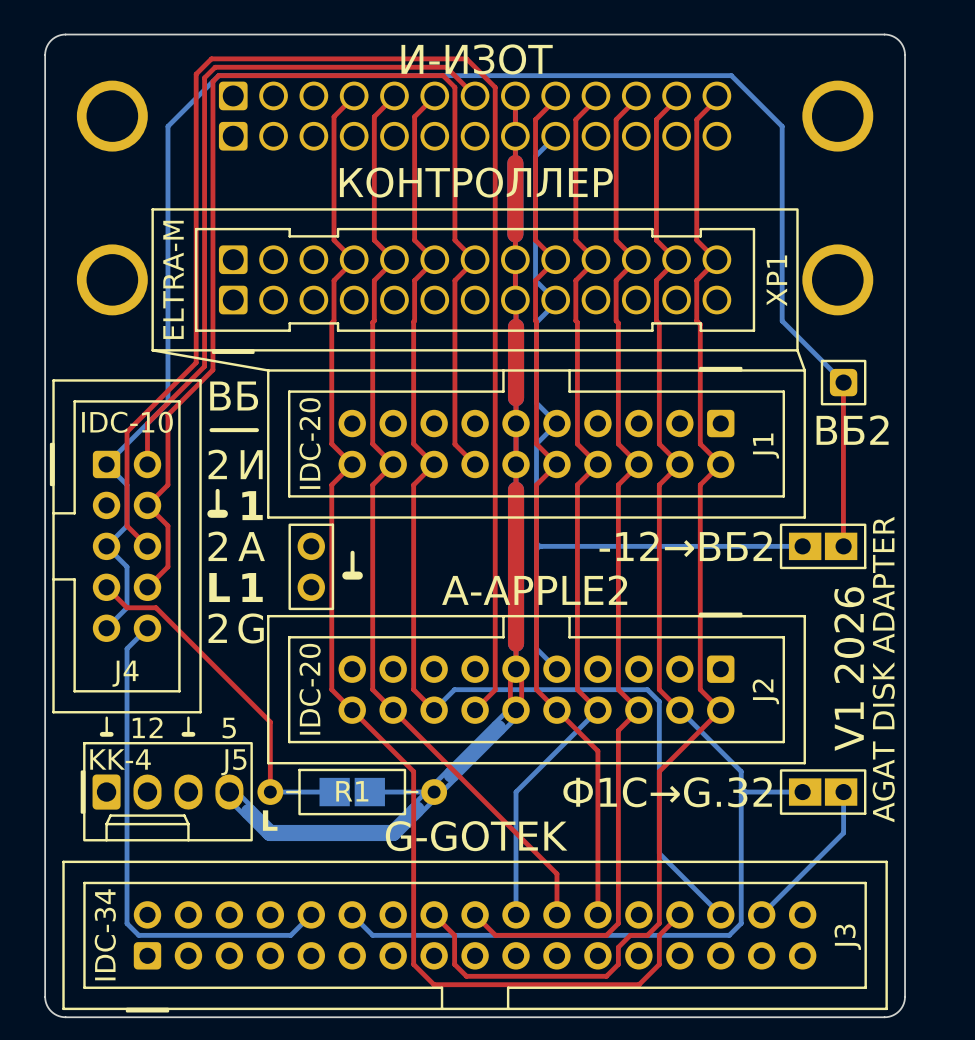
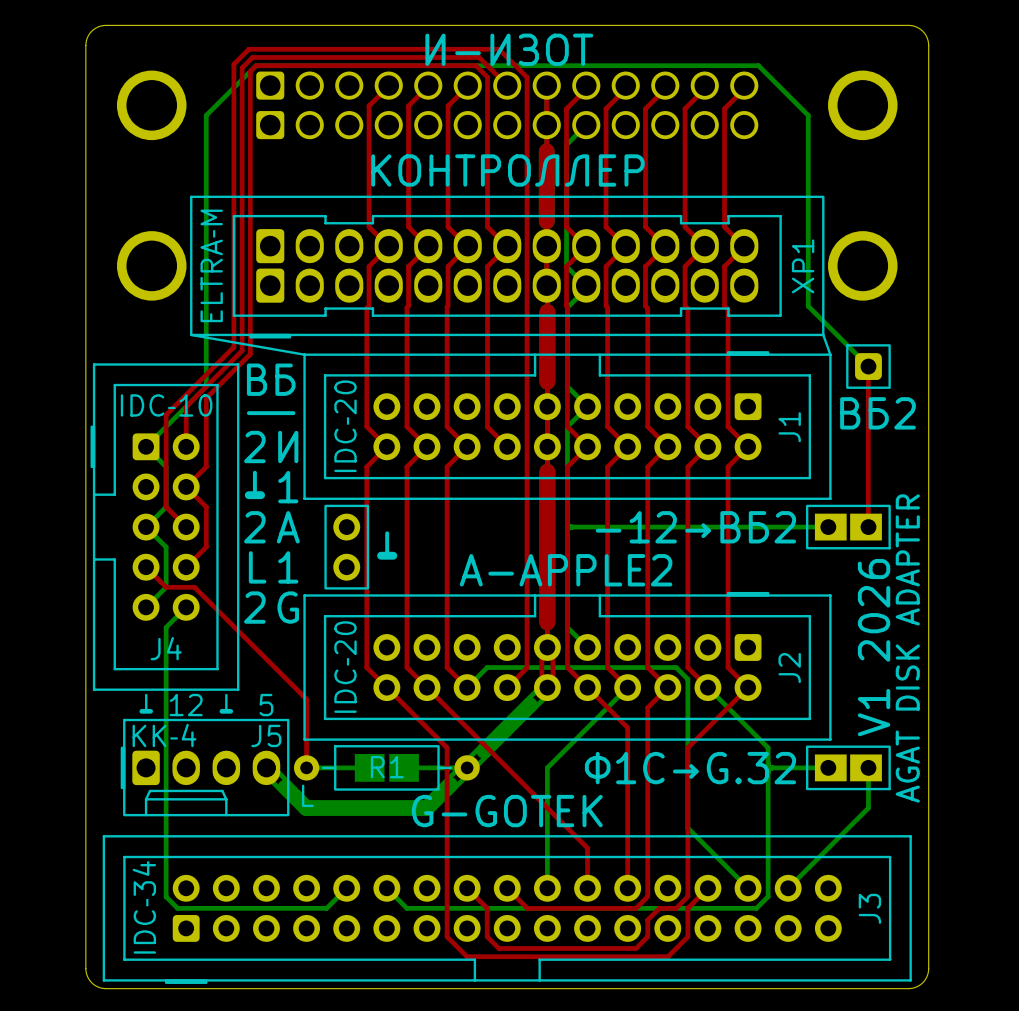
XP1 footprint: [76, 208, 874, 354] -> [116, 195, 898, 339]

